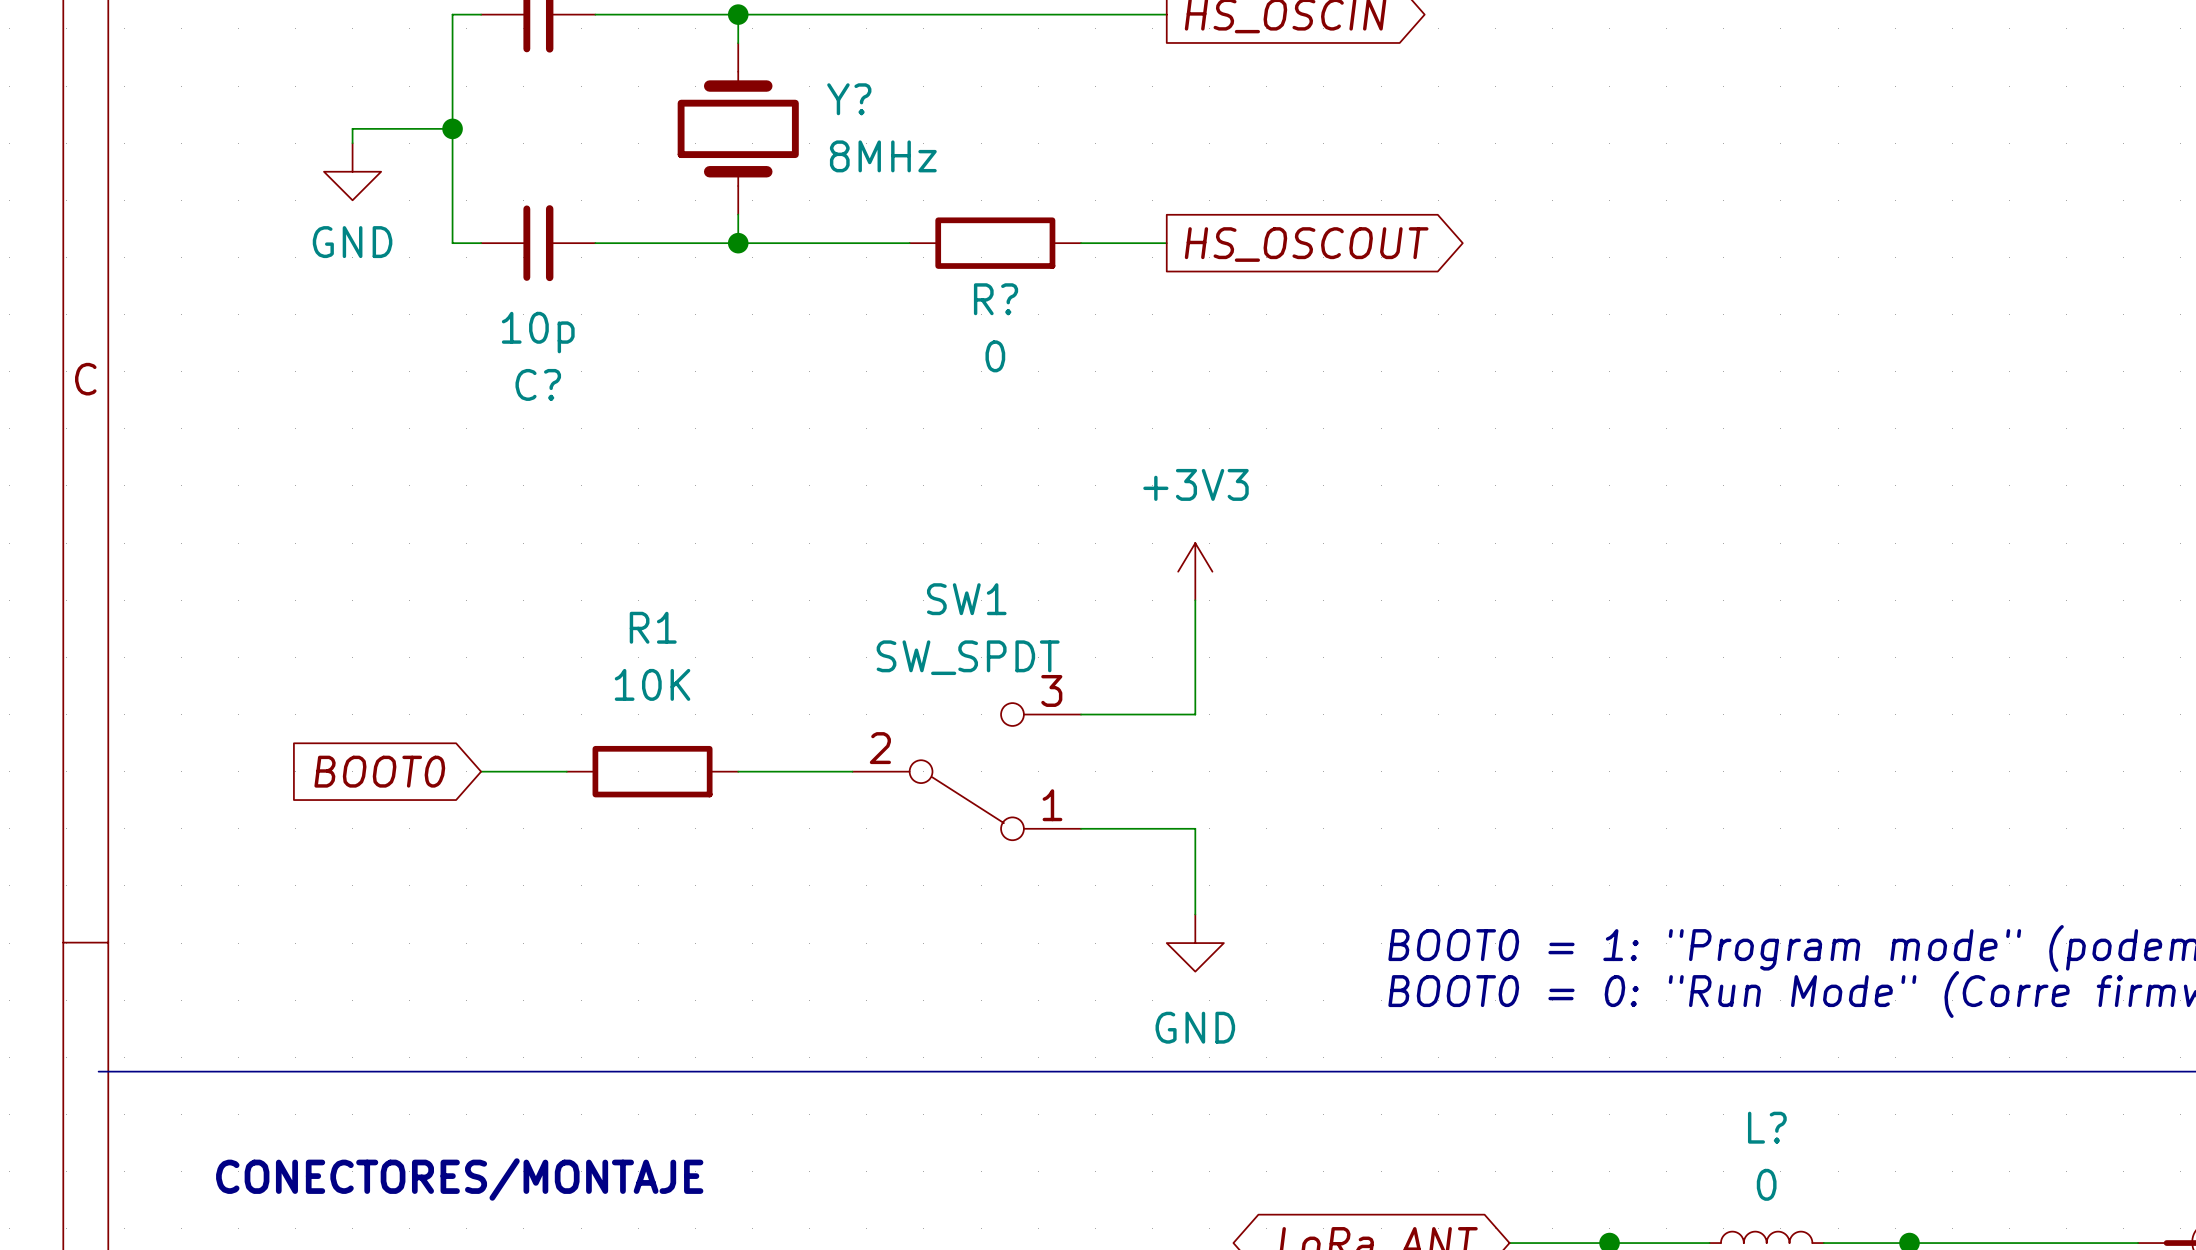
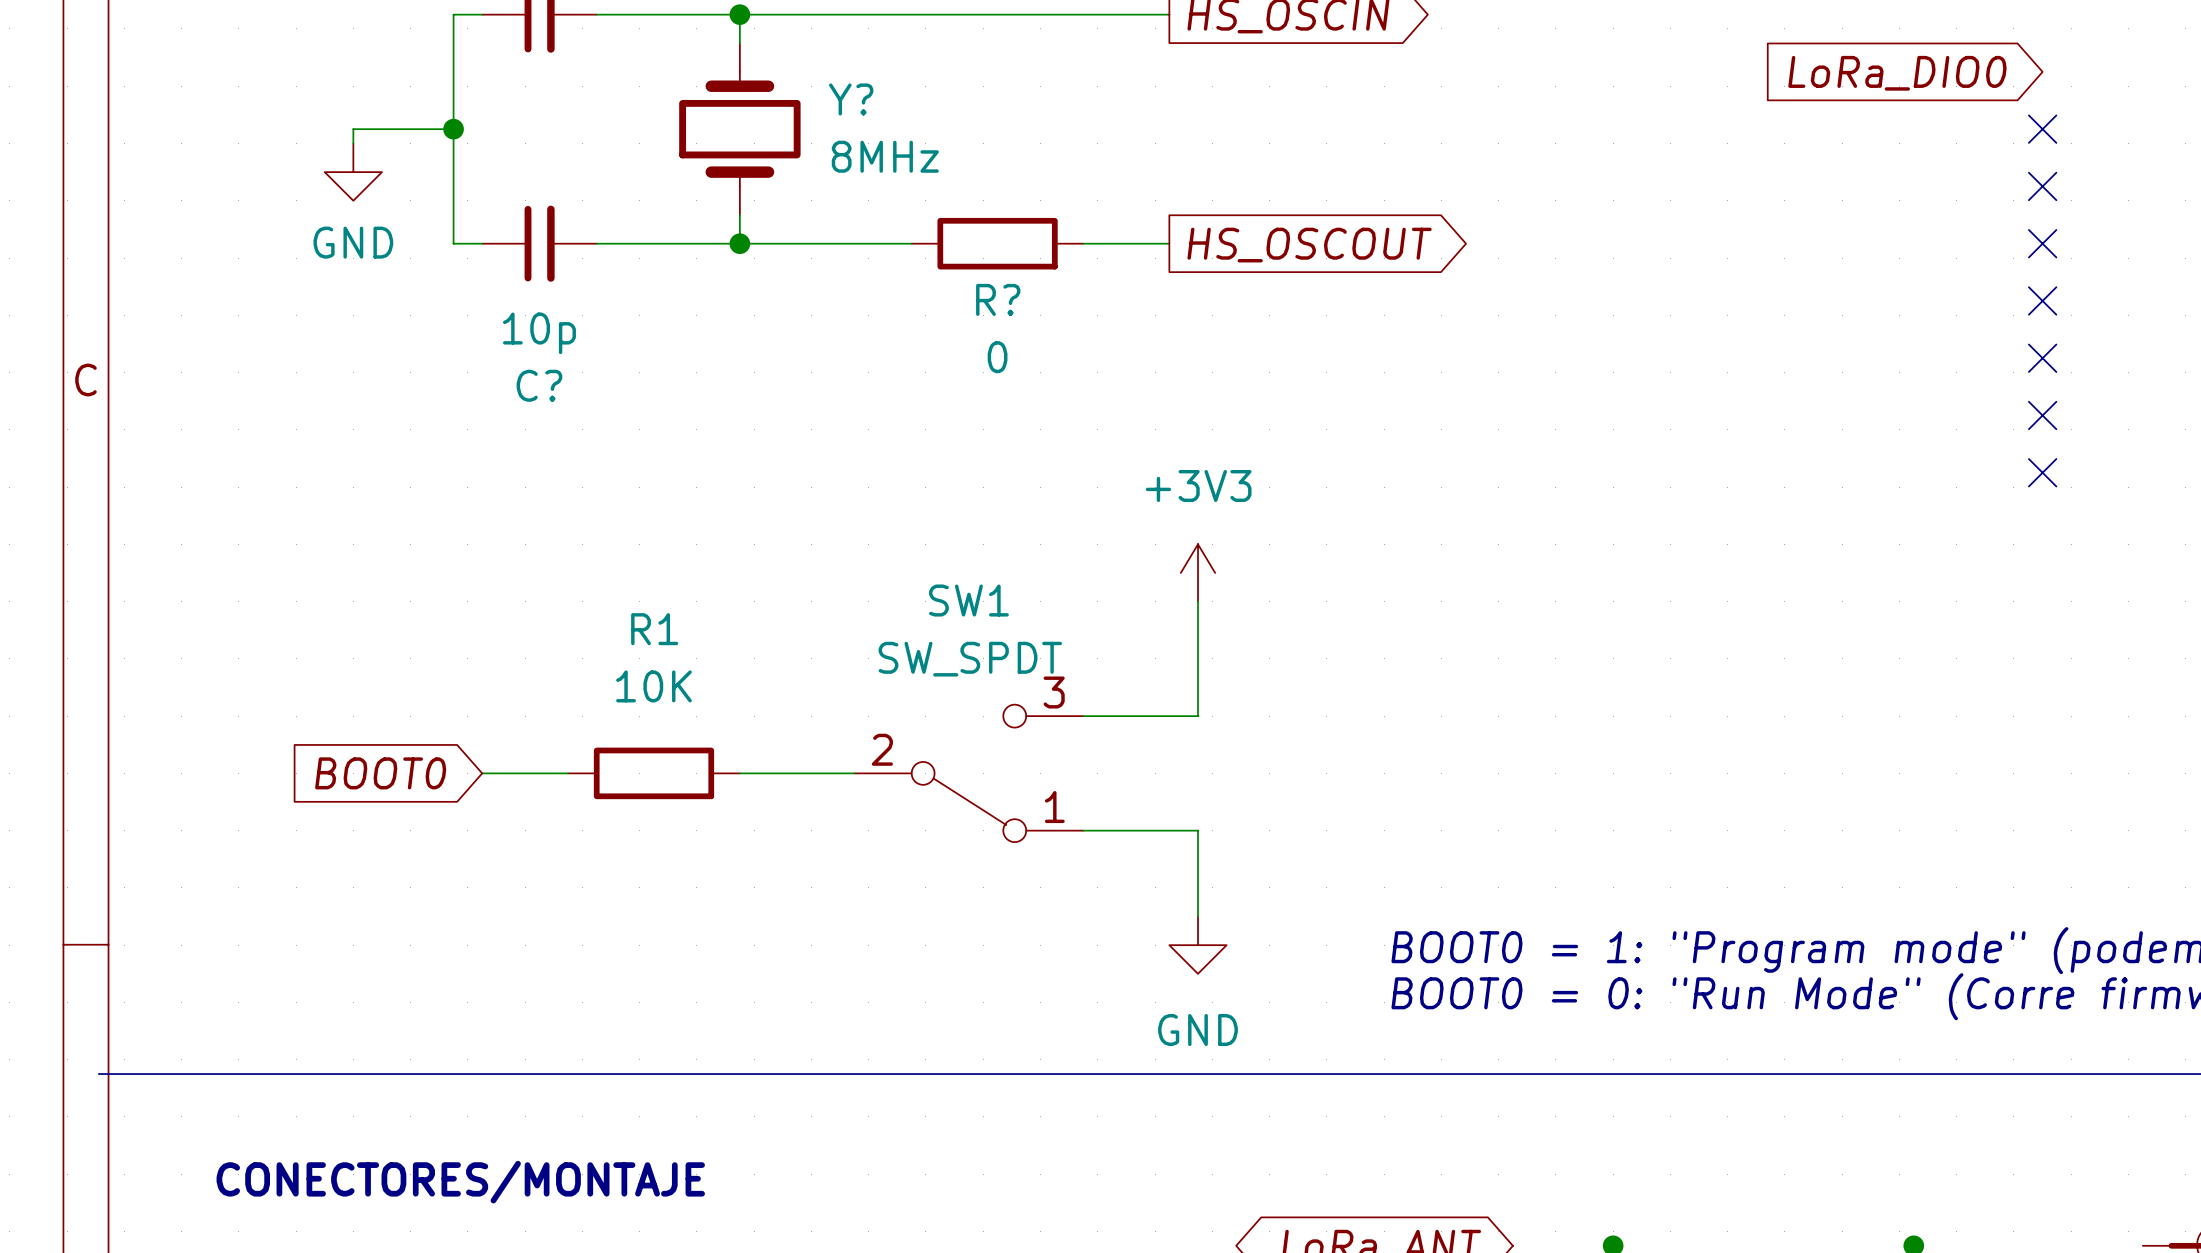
global label: none -> LoRa_DIO0 (1897, 73)
no-connect mark: none -> (2042, 129)
no-connect mark: none -> (2042, 186)
no-connect mark: none -> (2042, 243)
no-connect mark: none -> (2042, 300)
no-connect mark: none -> (2042, 358)
no-connect mark: none -> (2042, 415)
no-connect mark: none -> (2042, 472)
L?: 0 (1766, 1237) -> none
wire: (1509, 1243) (1709, 1243) -> none
wire: (1823, 1243) (2138, 1243) -> none

